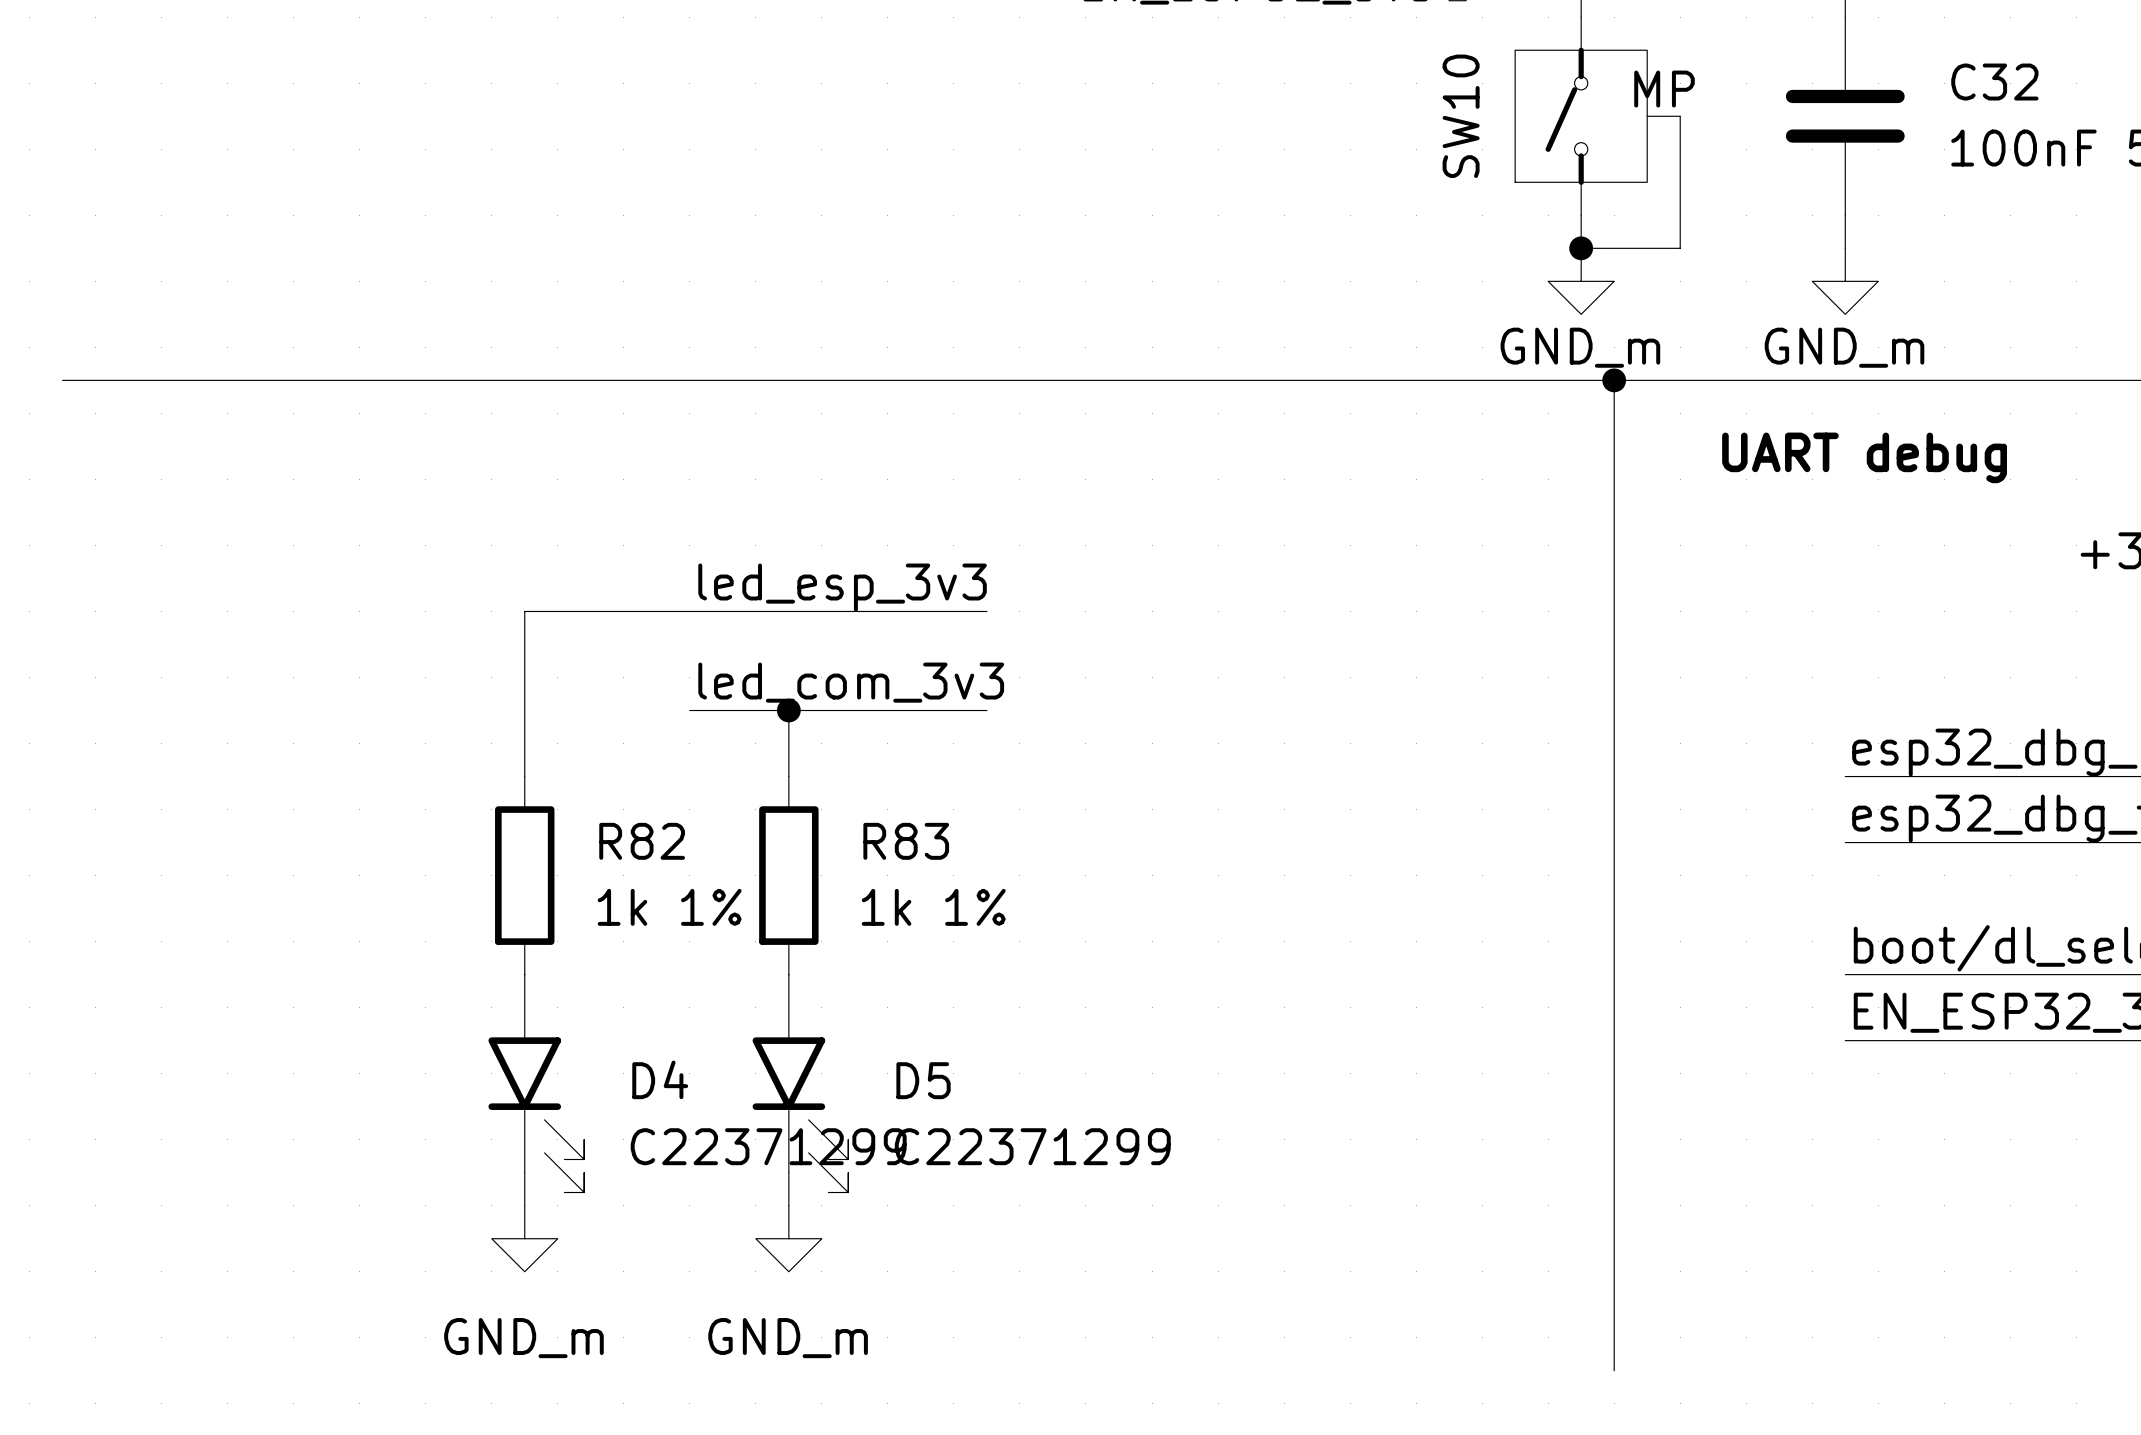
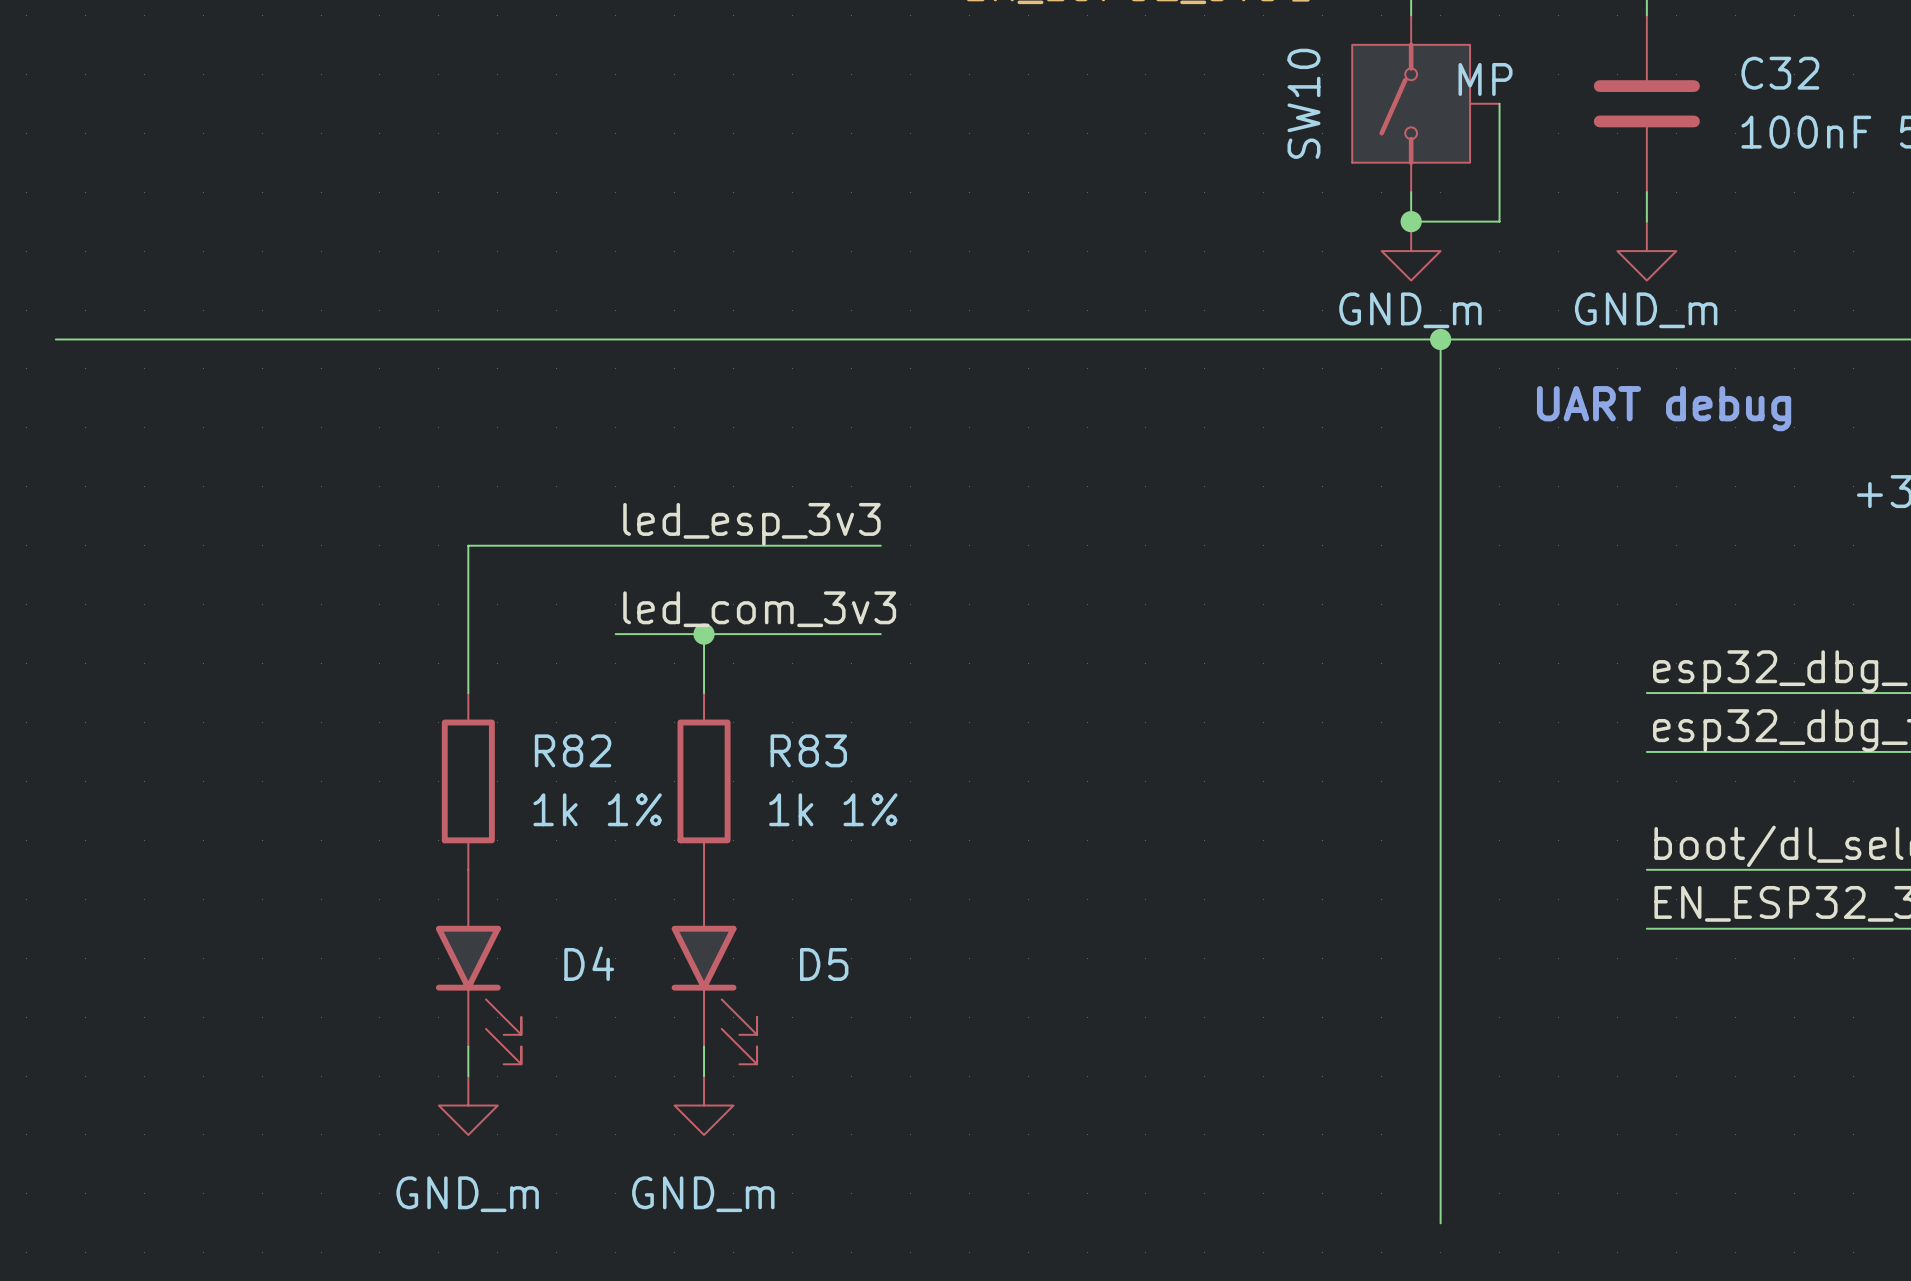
D4 text: C22371299 (768, 1146) -> none
D5 text: C22371299 (1032, 1146) -> none

